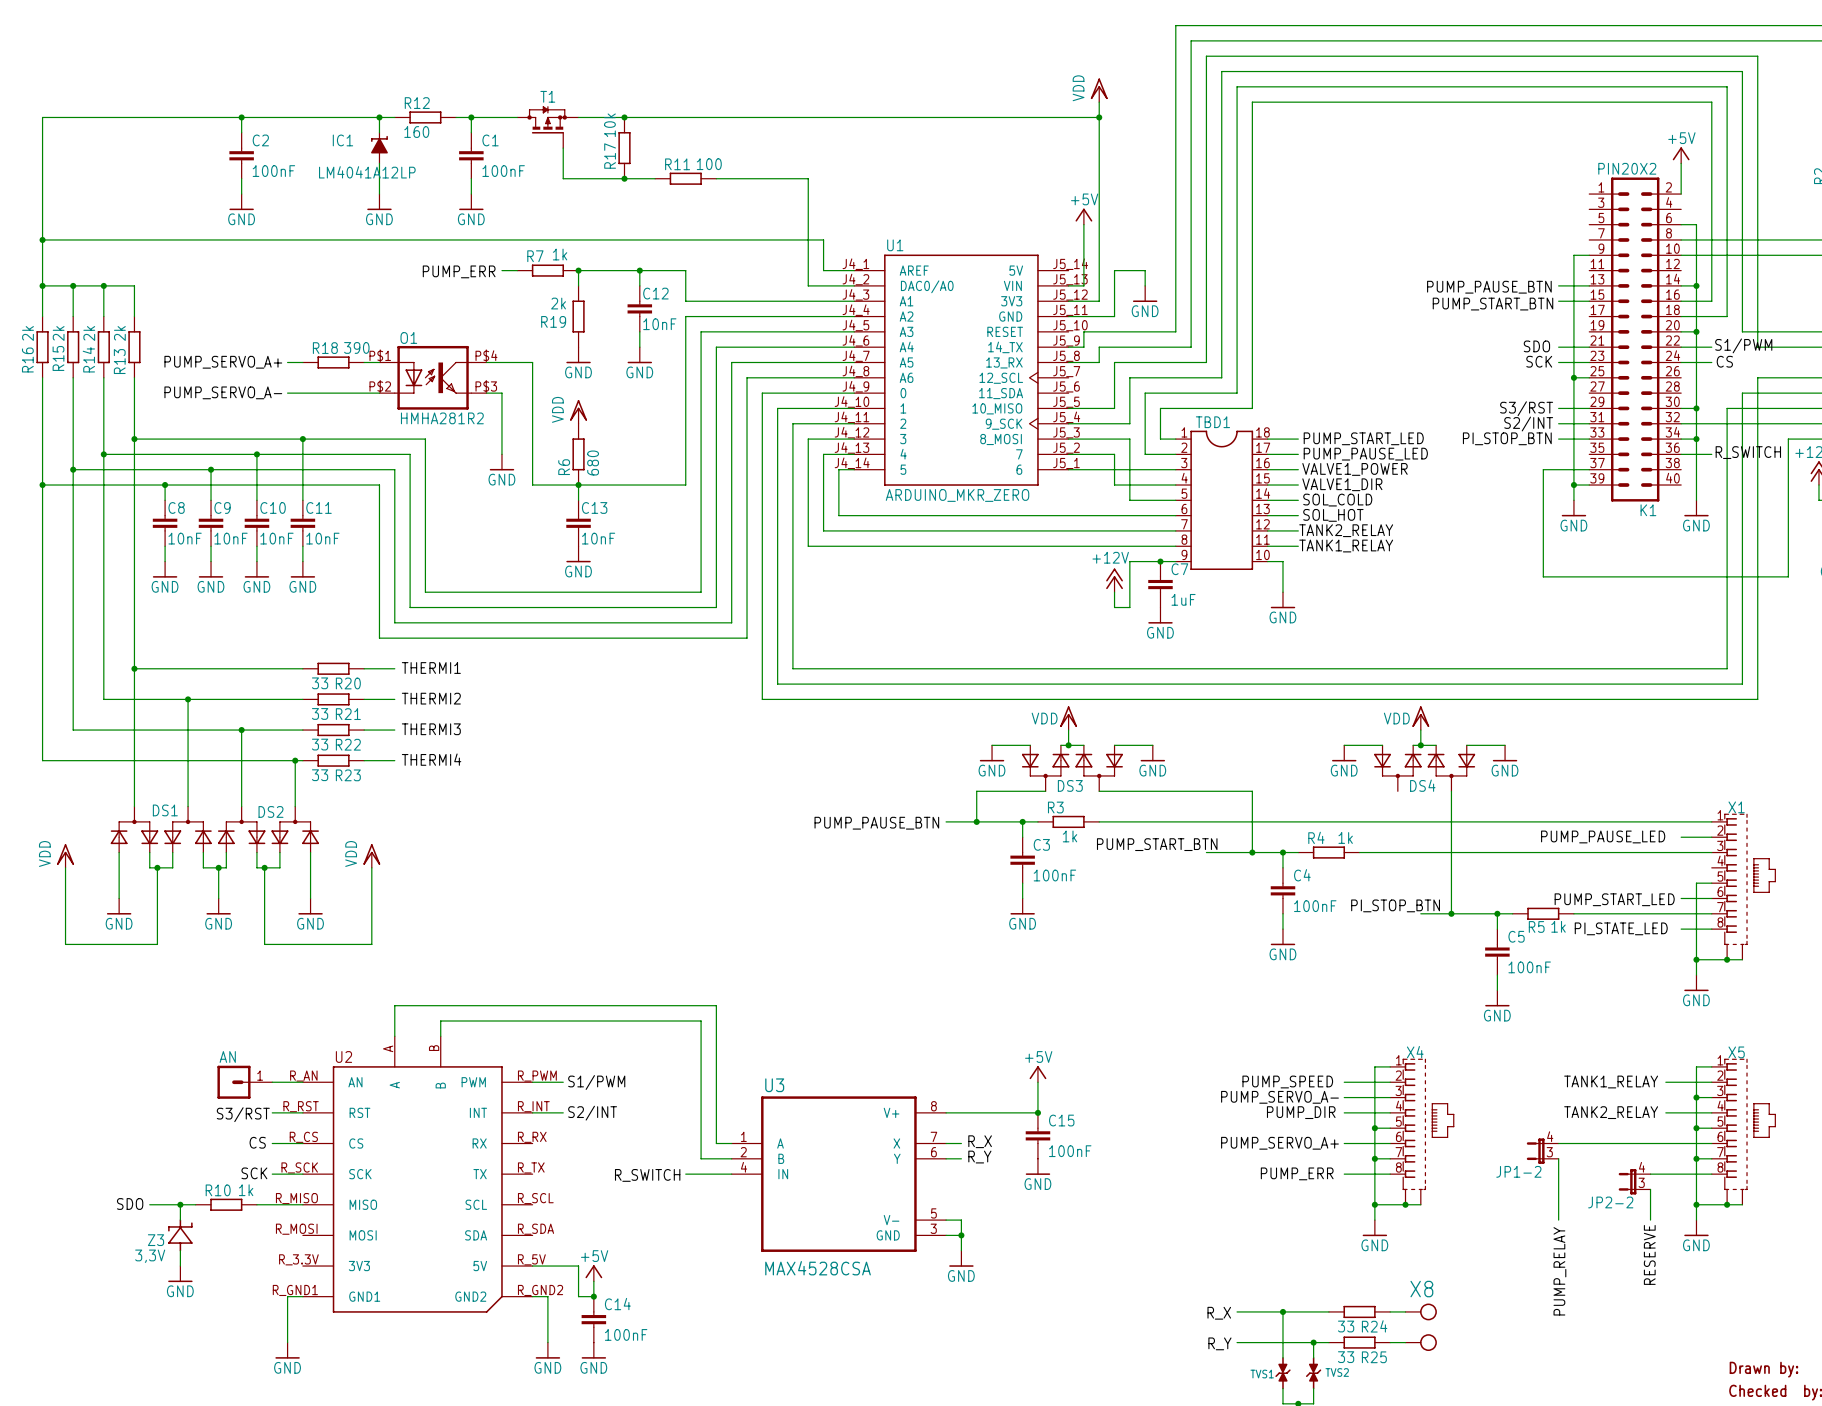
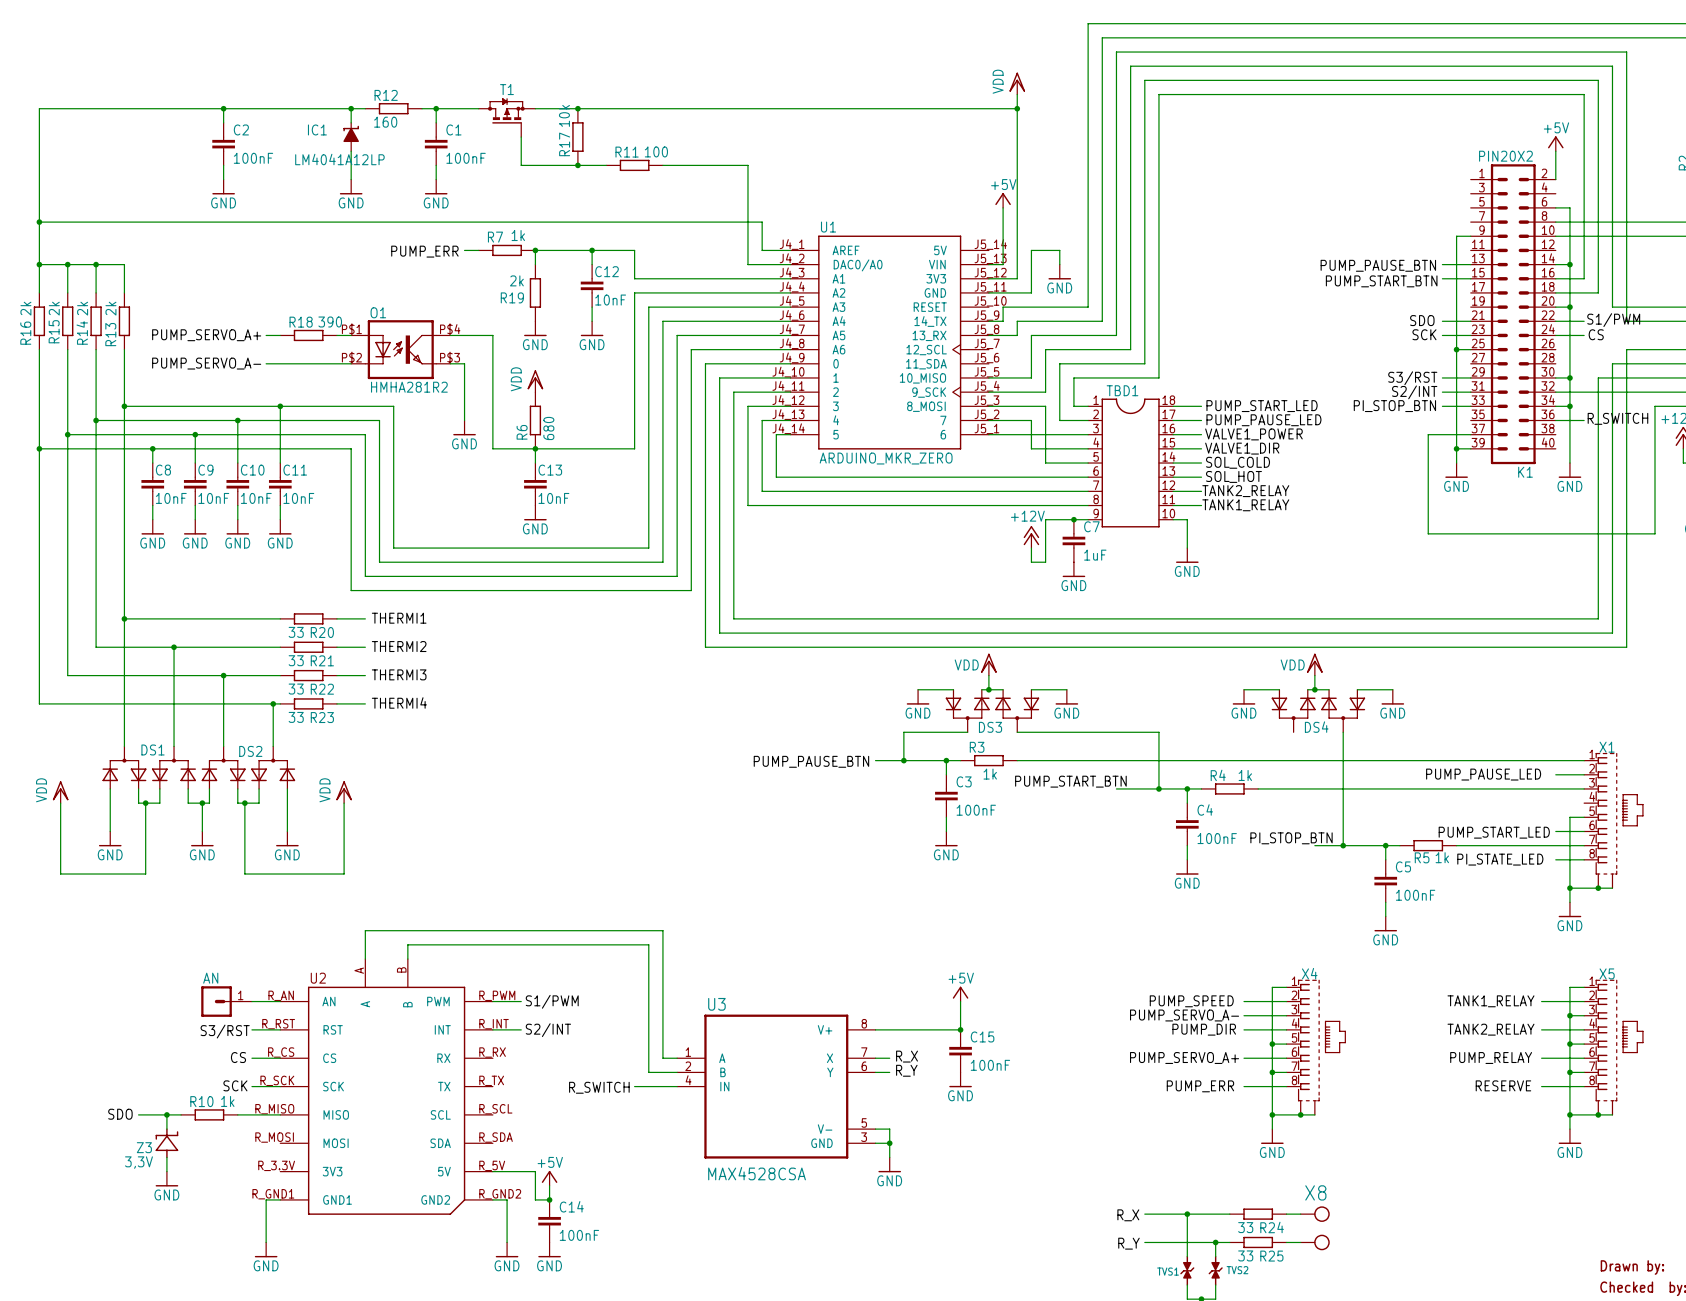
wire: (1558, 1143) (1665, 1143) -> none
JP1-2: (1542, 1151) -> none
wire: (1558, 1158) (1558, 1220) -> none
wire: (1650, 1174) (1665, 1174) -> none
JP2-2: (1634, 1181) -> none
wire: (1650, 1189) (1650, 1220) -> none
label rotation: 0° (1649, 1254) -> 90° clockwise (1503, 1085)
label position: RESERVE (1649, 1254) -> RESERVE (1503, 1085)
label rotation: 0° (1559, 1271) -> 90° clockwise (1491, 1058)
label position: PUMP_RELAY (1559, 1271) -> PUMP_RELAY (1491, 1058)

